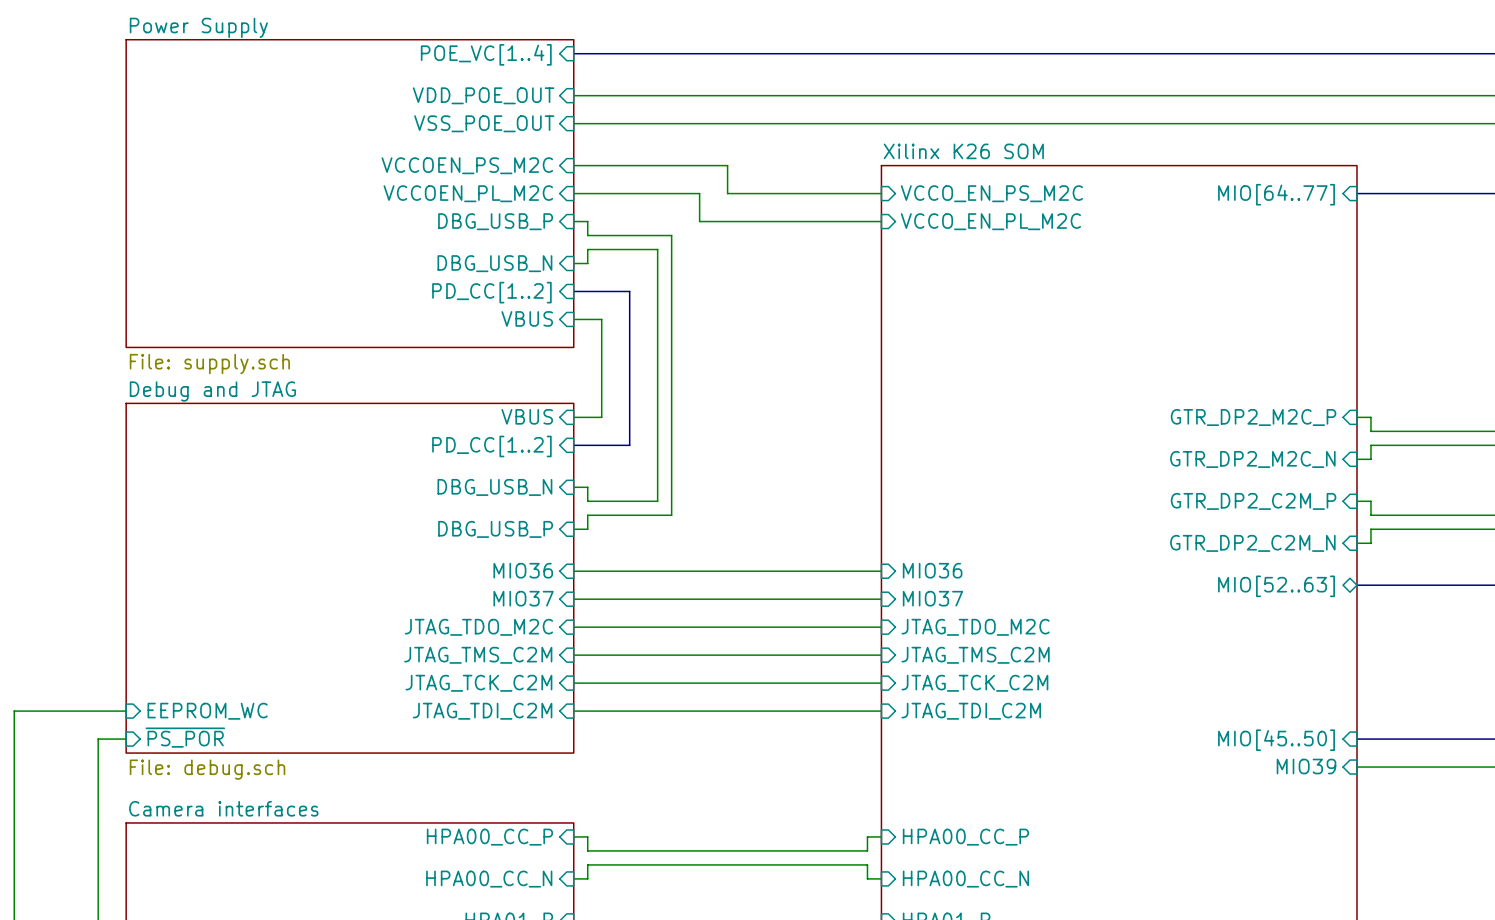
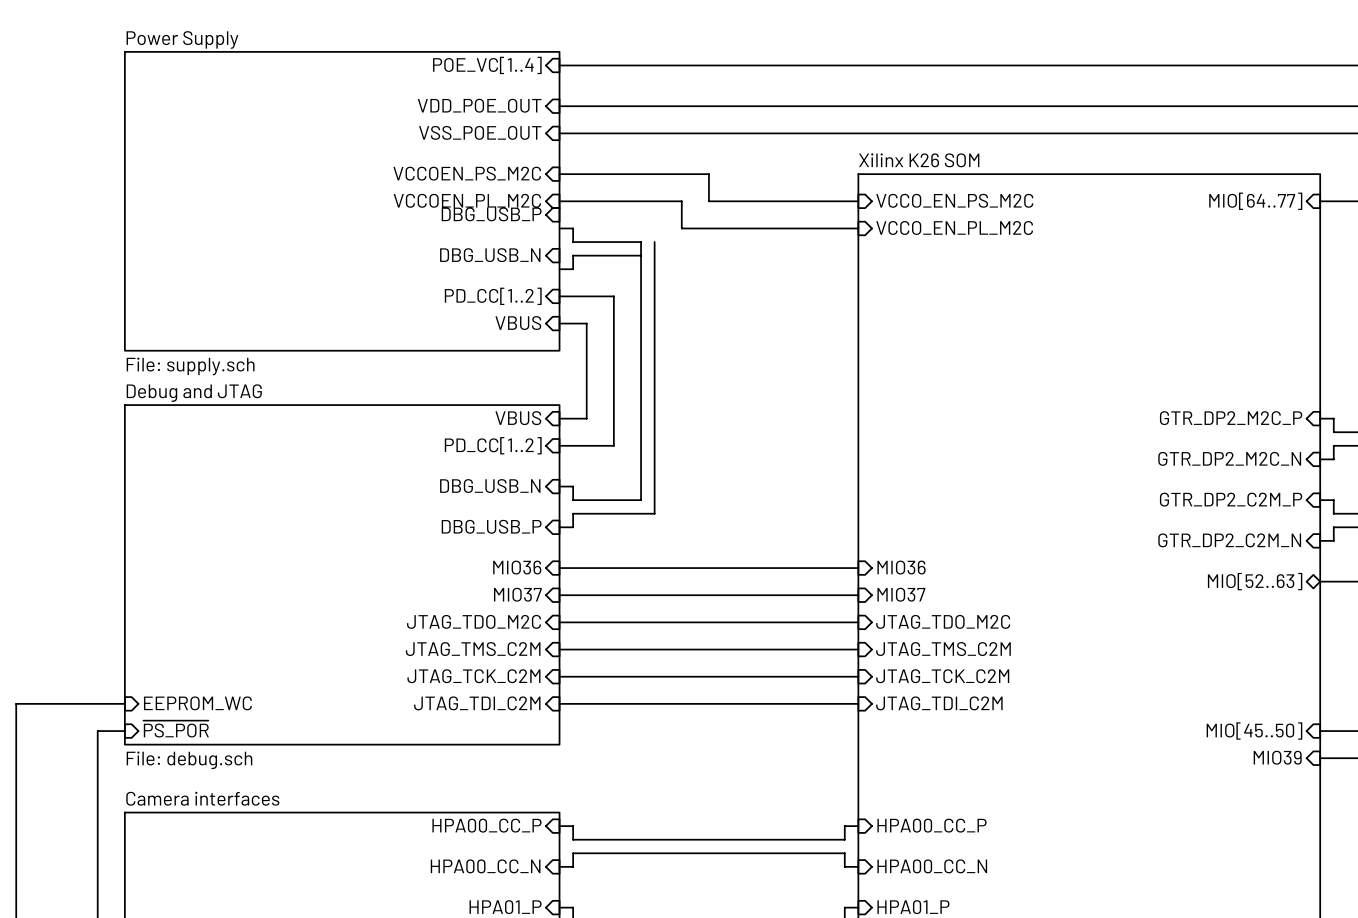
sheet pin position: DBG_USB_P (495, 221) -> DBG_USB_P (491, 214)
wire: (657, 235) (671, 235) -> (641, 242) (641, 255)
sheet pin position: DBG_USB_N (494, 263) -> DBG_USB_N (490, 255)

